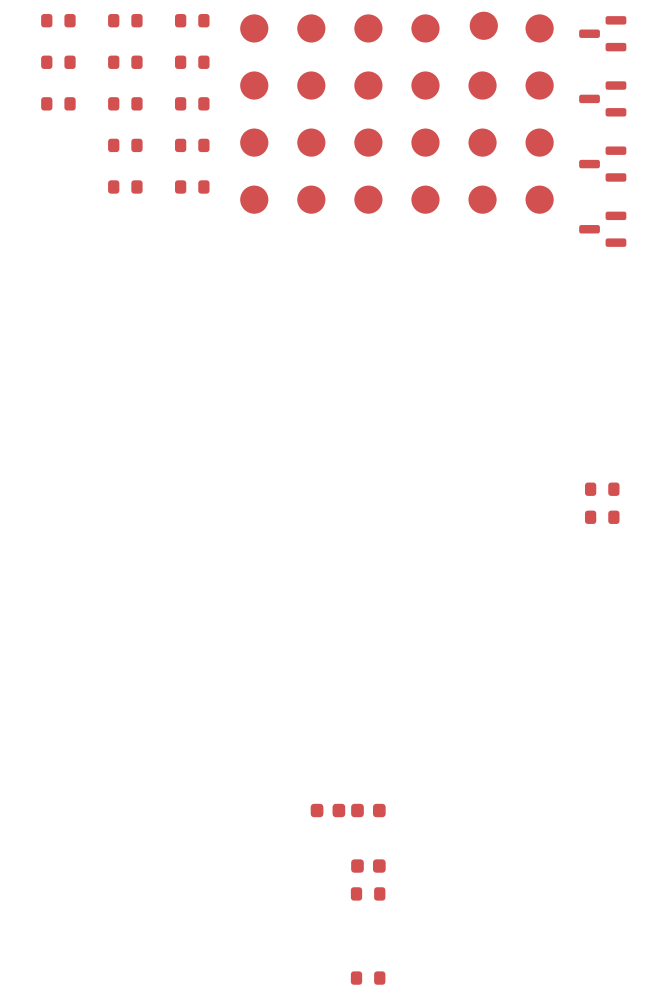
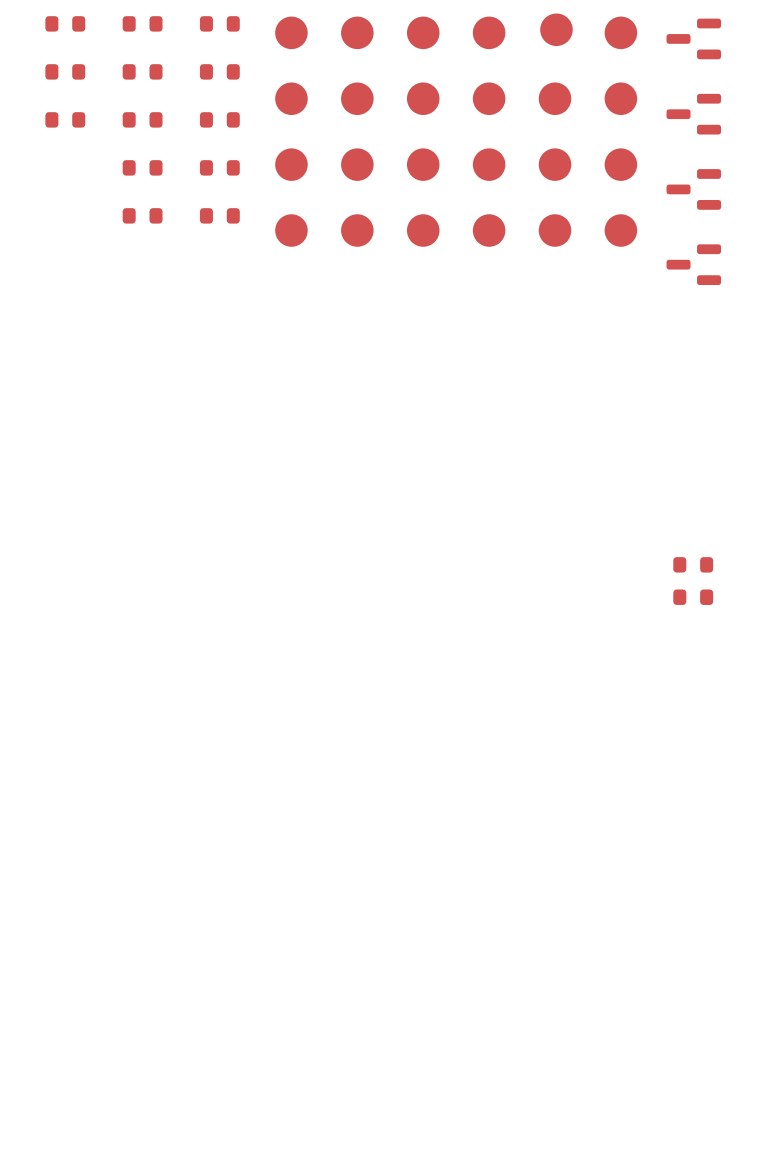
part: (327, 810) -> none
part: (368, 810) -> none
part: (368, 866) -> none
part: (368, 893) -> none
part: (368, 978) -> none

